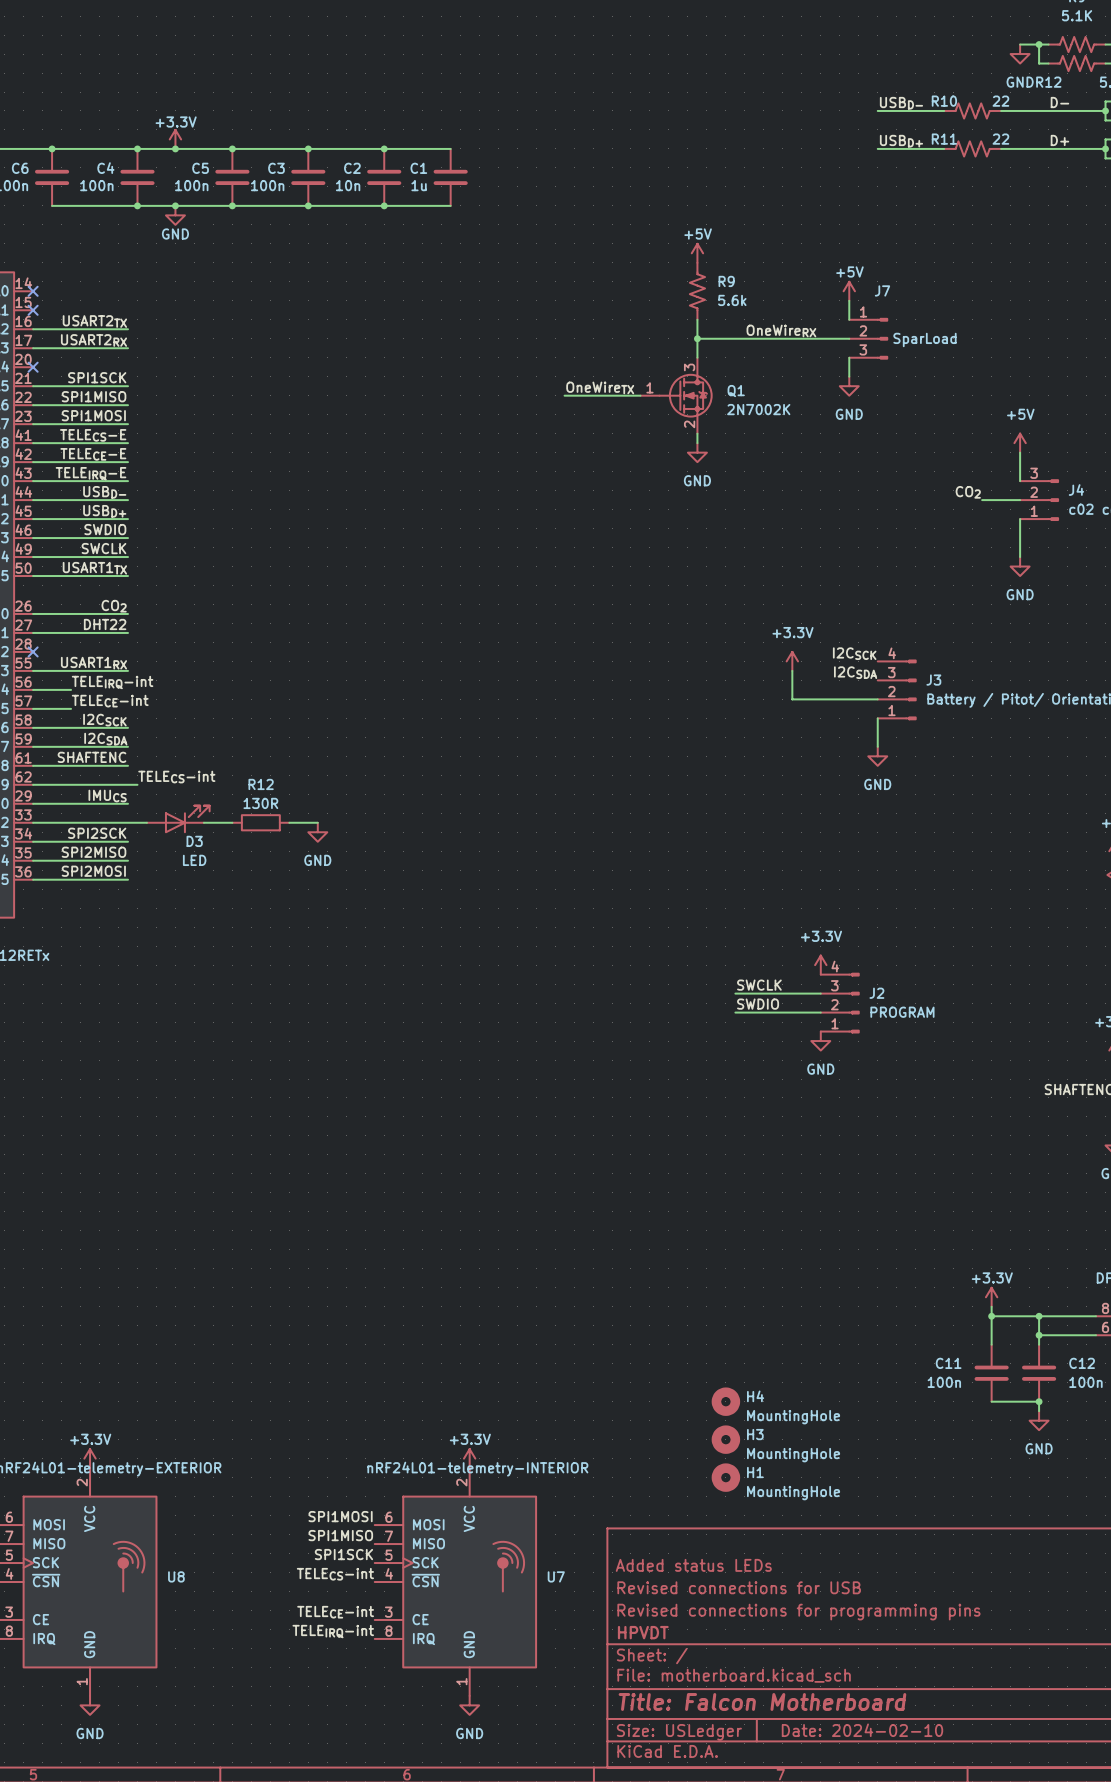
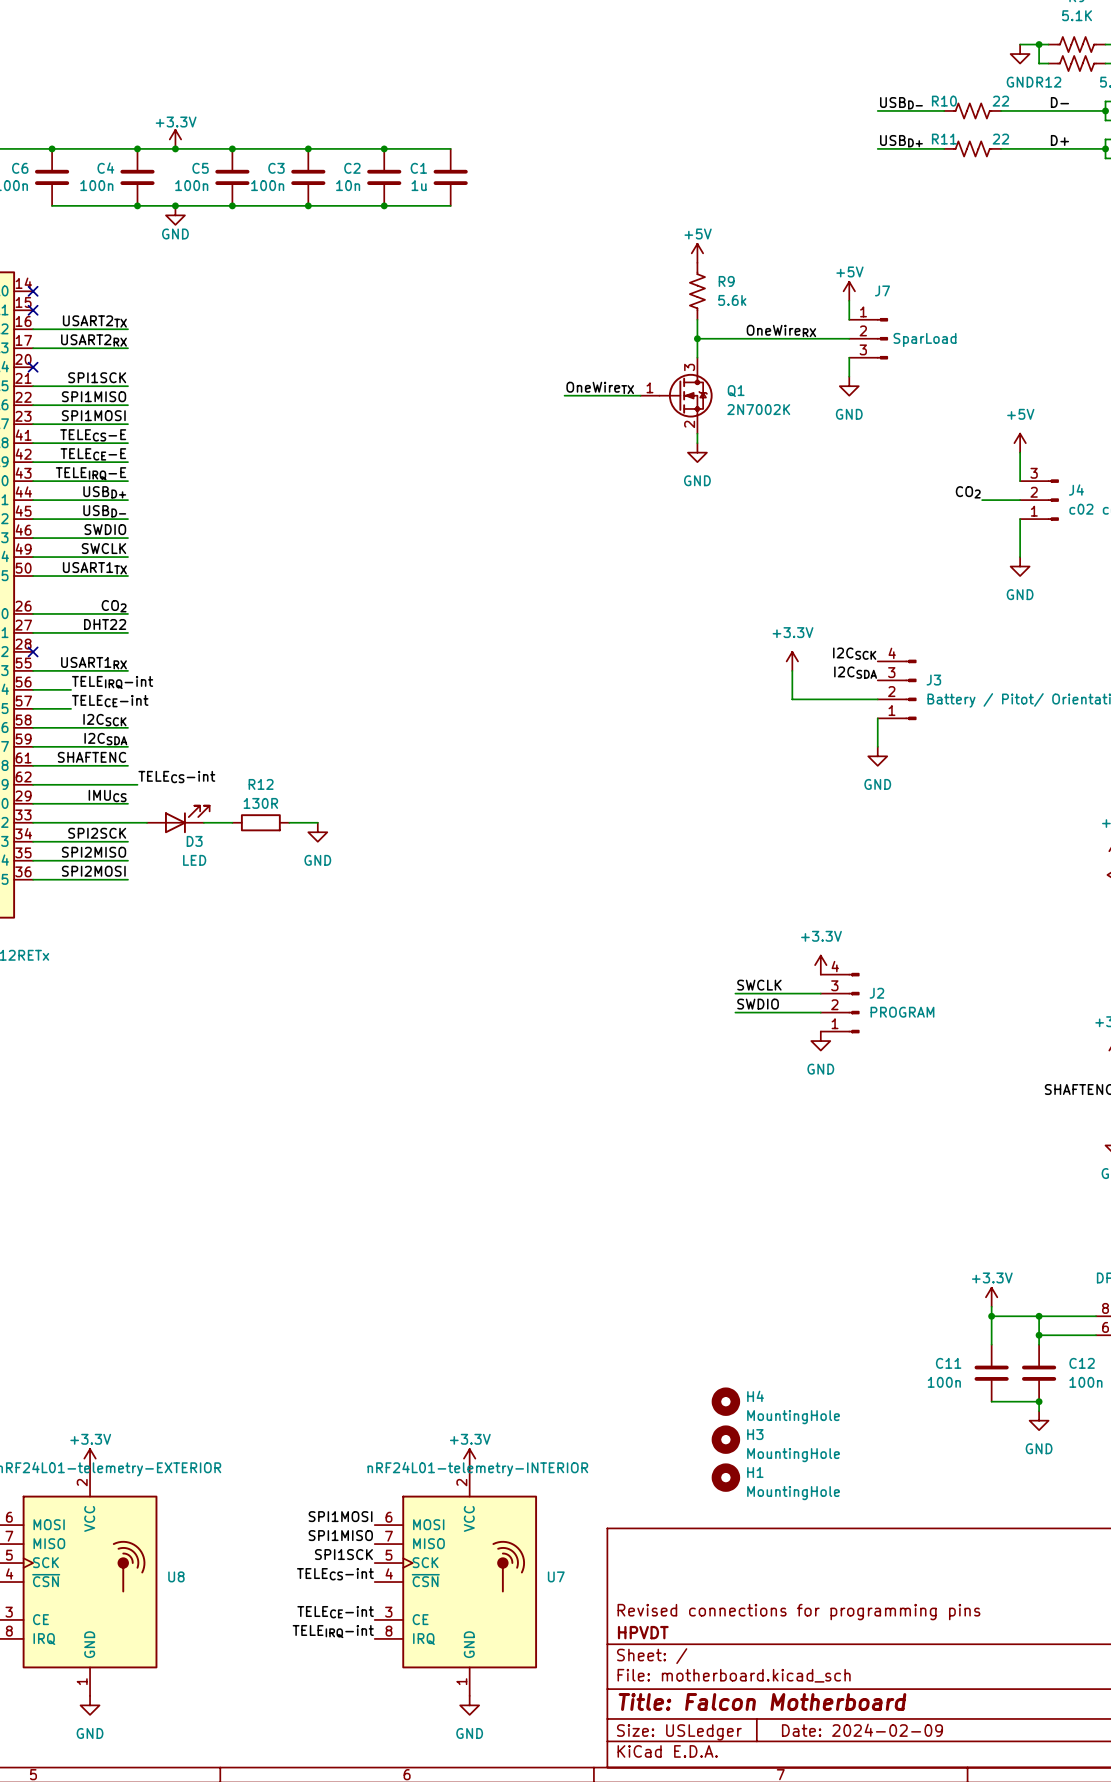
label: USBD- (104, 492) -> USBD+ (104, 492)
label: USBD+ (104, 511) -> USBD- (104, 511)
title block: Added status LEDs (693, 1565) -> none
title block: Revised connections for USB (739, 1587) -> none
title block: Date: 2024-02-10 (862, 1730) -> Date: 2024-02-09 (862, 1730)

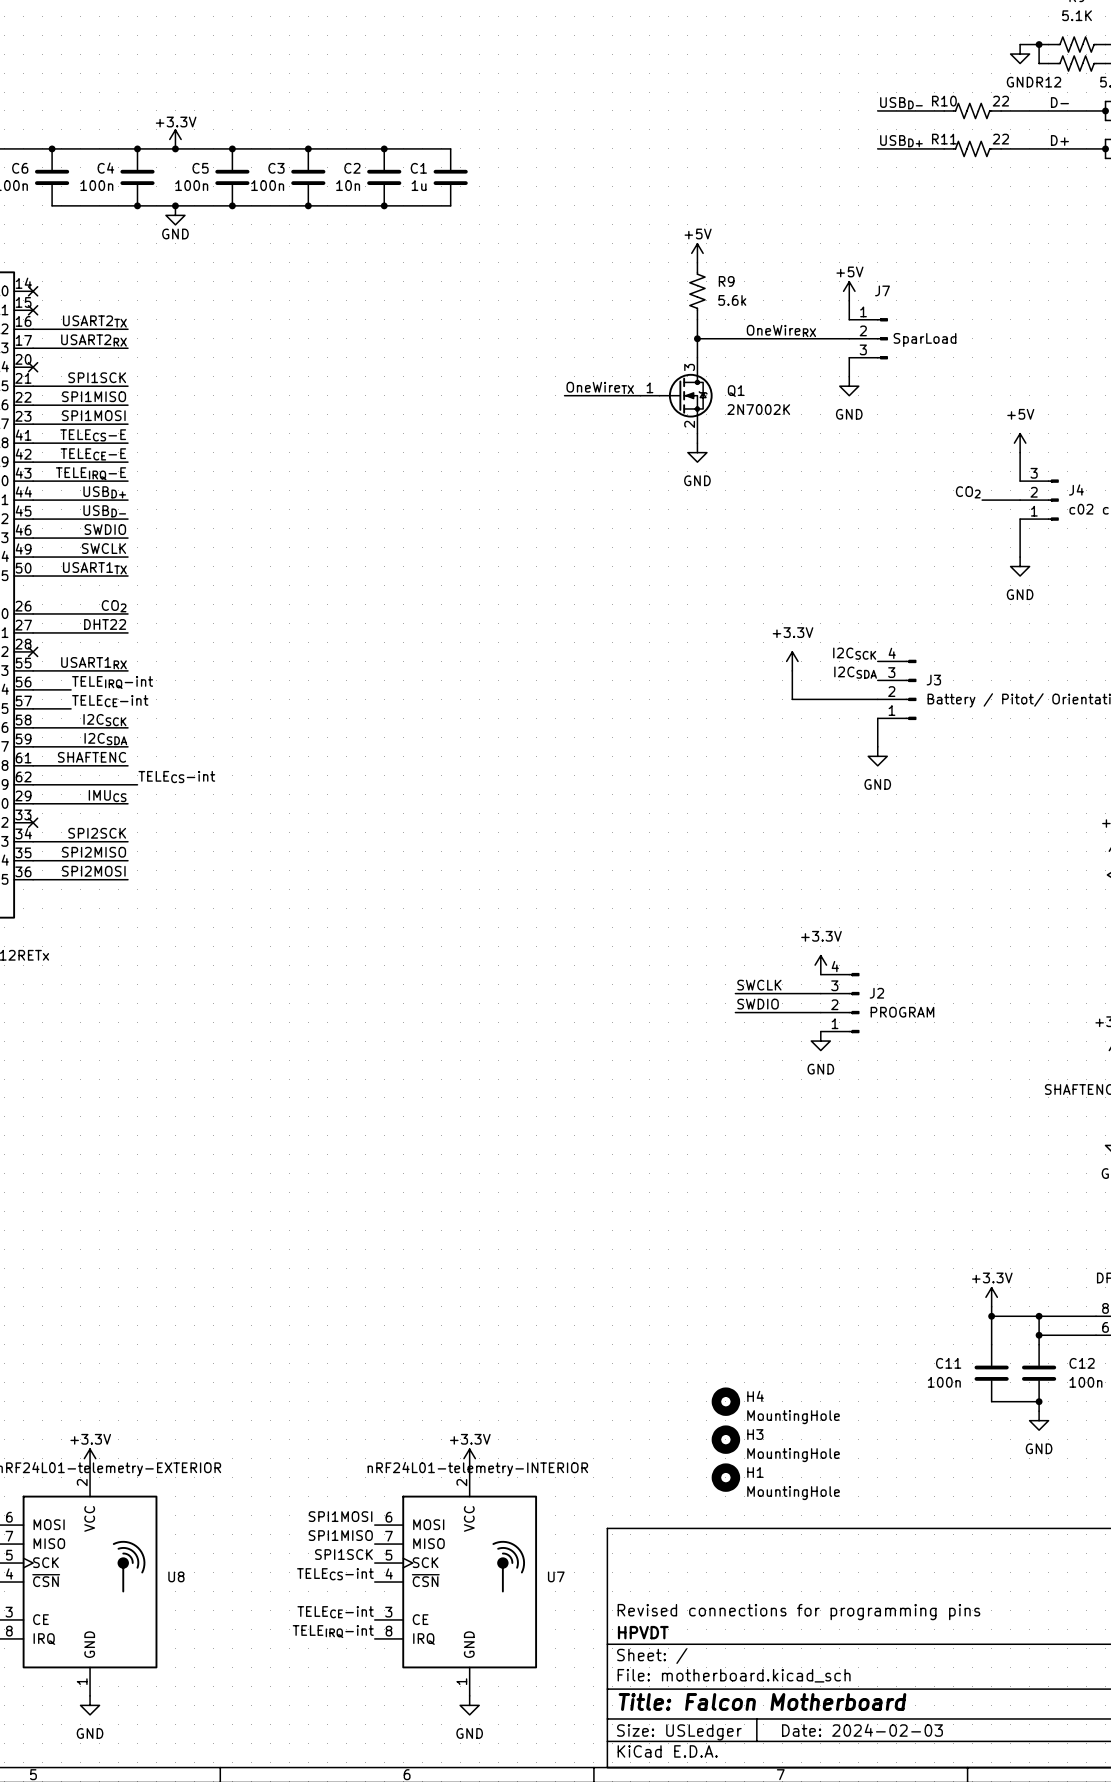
D3: LED (178, 819) -> none
wire: (33, 822) (146, 822) -> none
no-connect mark: none -> (33, 822)
wire: (203, 822) (232, 822) -> none
R12: 130R (260, 822) -> none
wire: (289, 822) (317, 822) -> none
power symbol: GND (317, 832) -> none
title block: Date: 2024-02-09 (862, 1730) -> Date: 2024-02-03 (862, 1730)

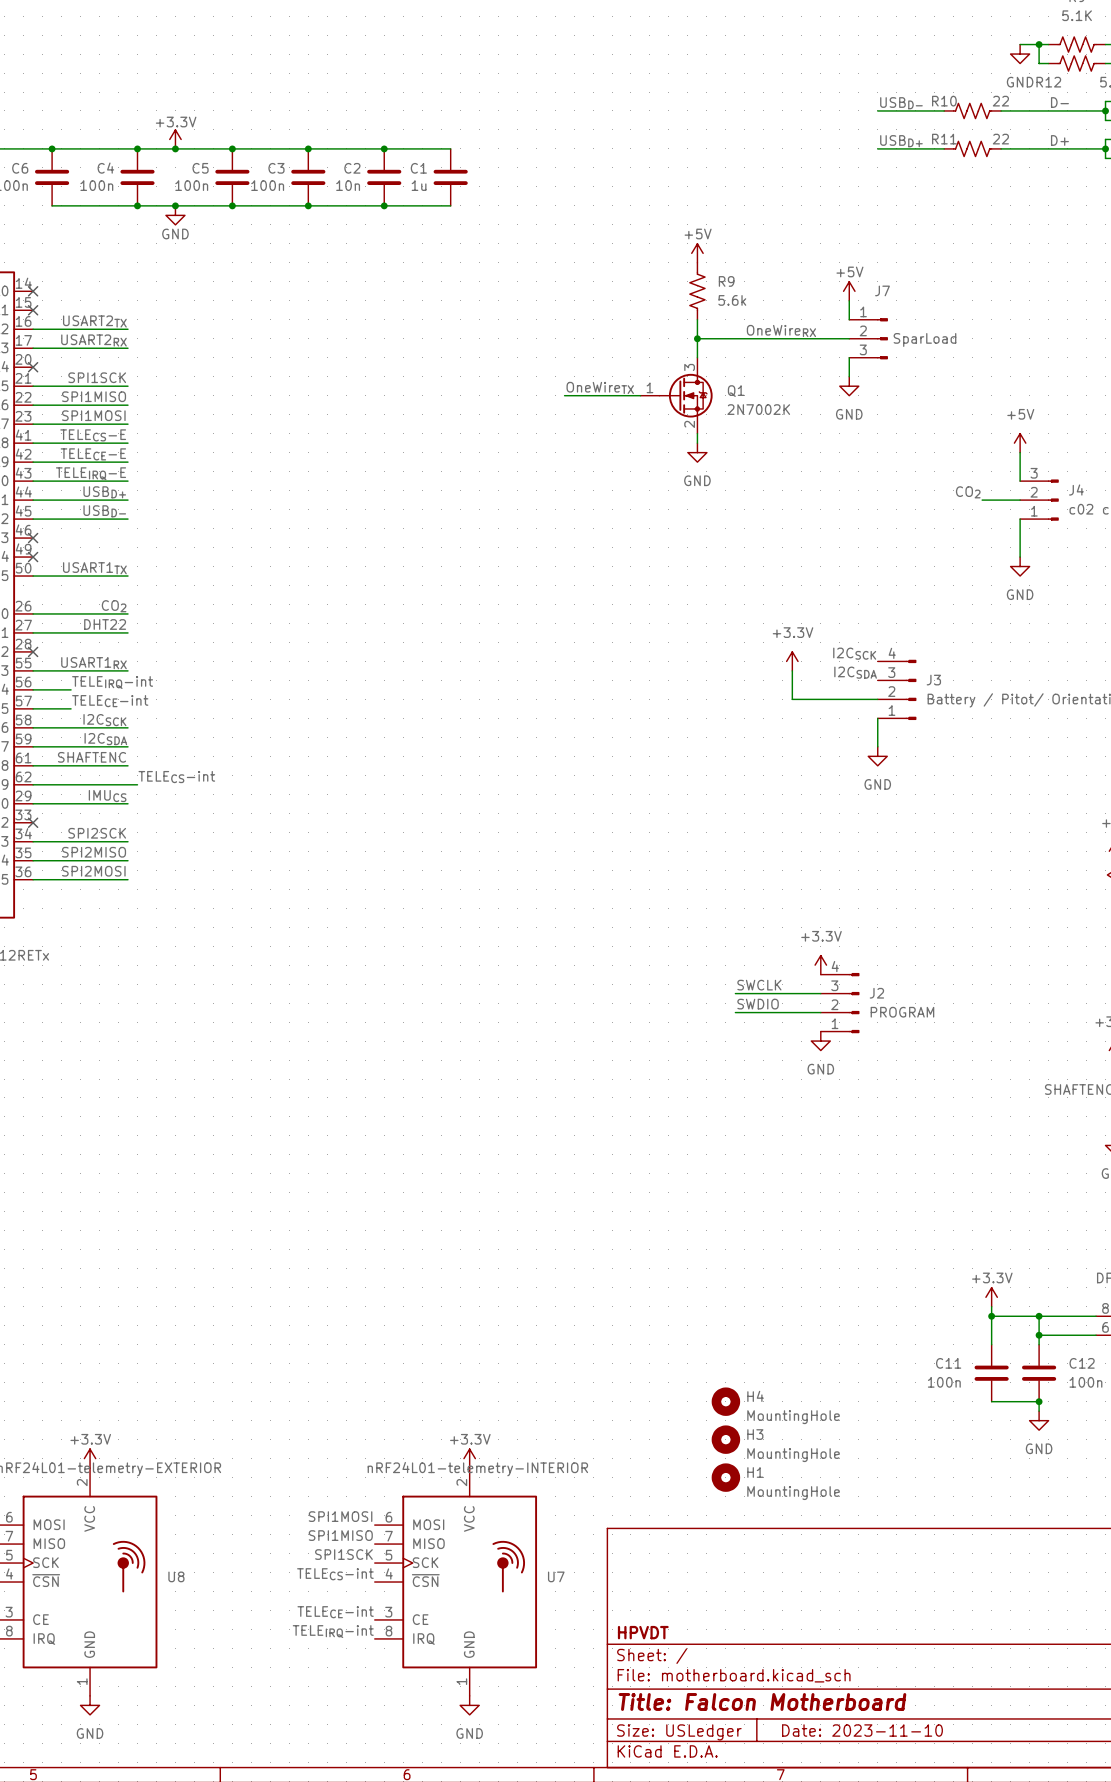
label: SWDIO (105, 529) -> none
wire: (33, 538) (128, 538) -> none
no-connect mark: none -> (33, 538)
label: SWCLK (103, 548) -> none
wire: (33, 557) (128, 557) -> none
no-connect mark: none -> (33, 557)
title block: Revised connections for programming pins (798, 1612) -> none
title block: Date: 2024-02-03 (862, 1730) -> Date: 2023-11-10 (862, 1730)

